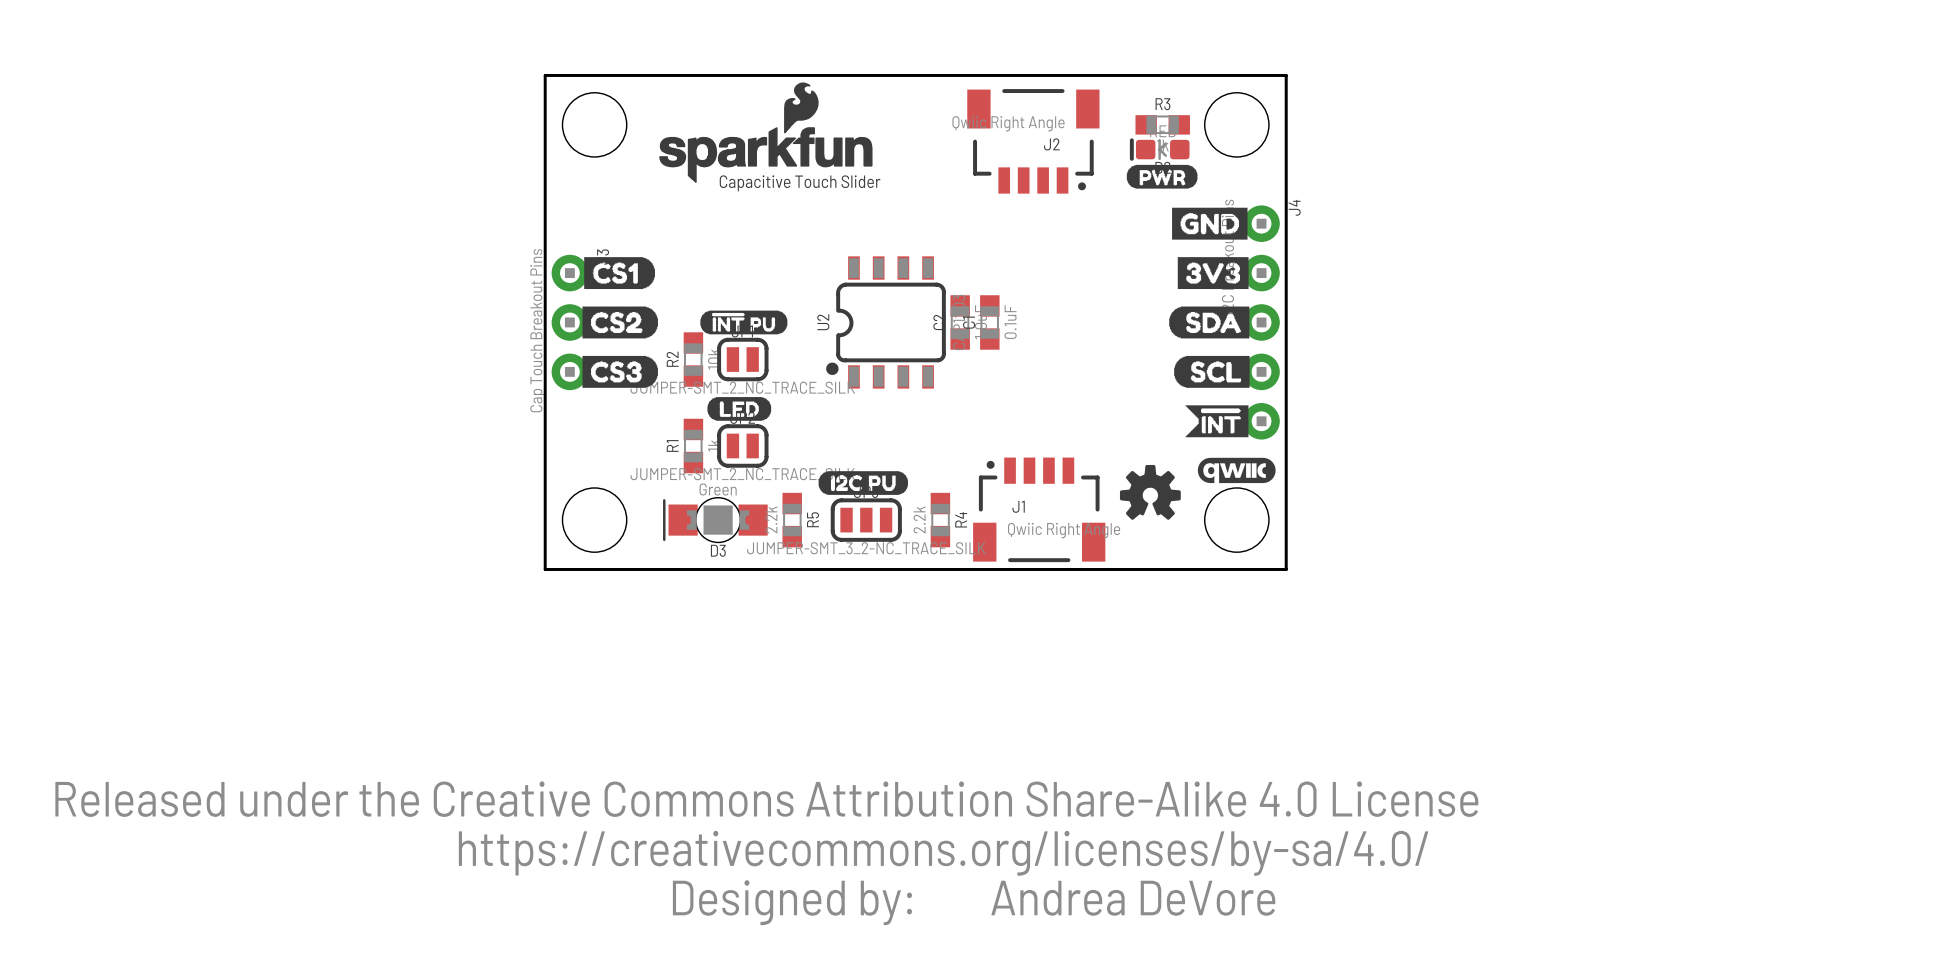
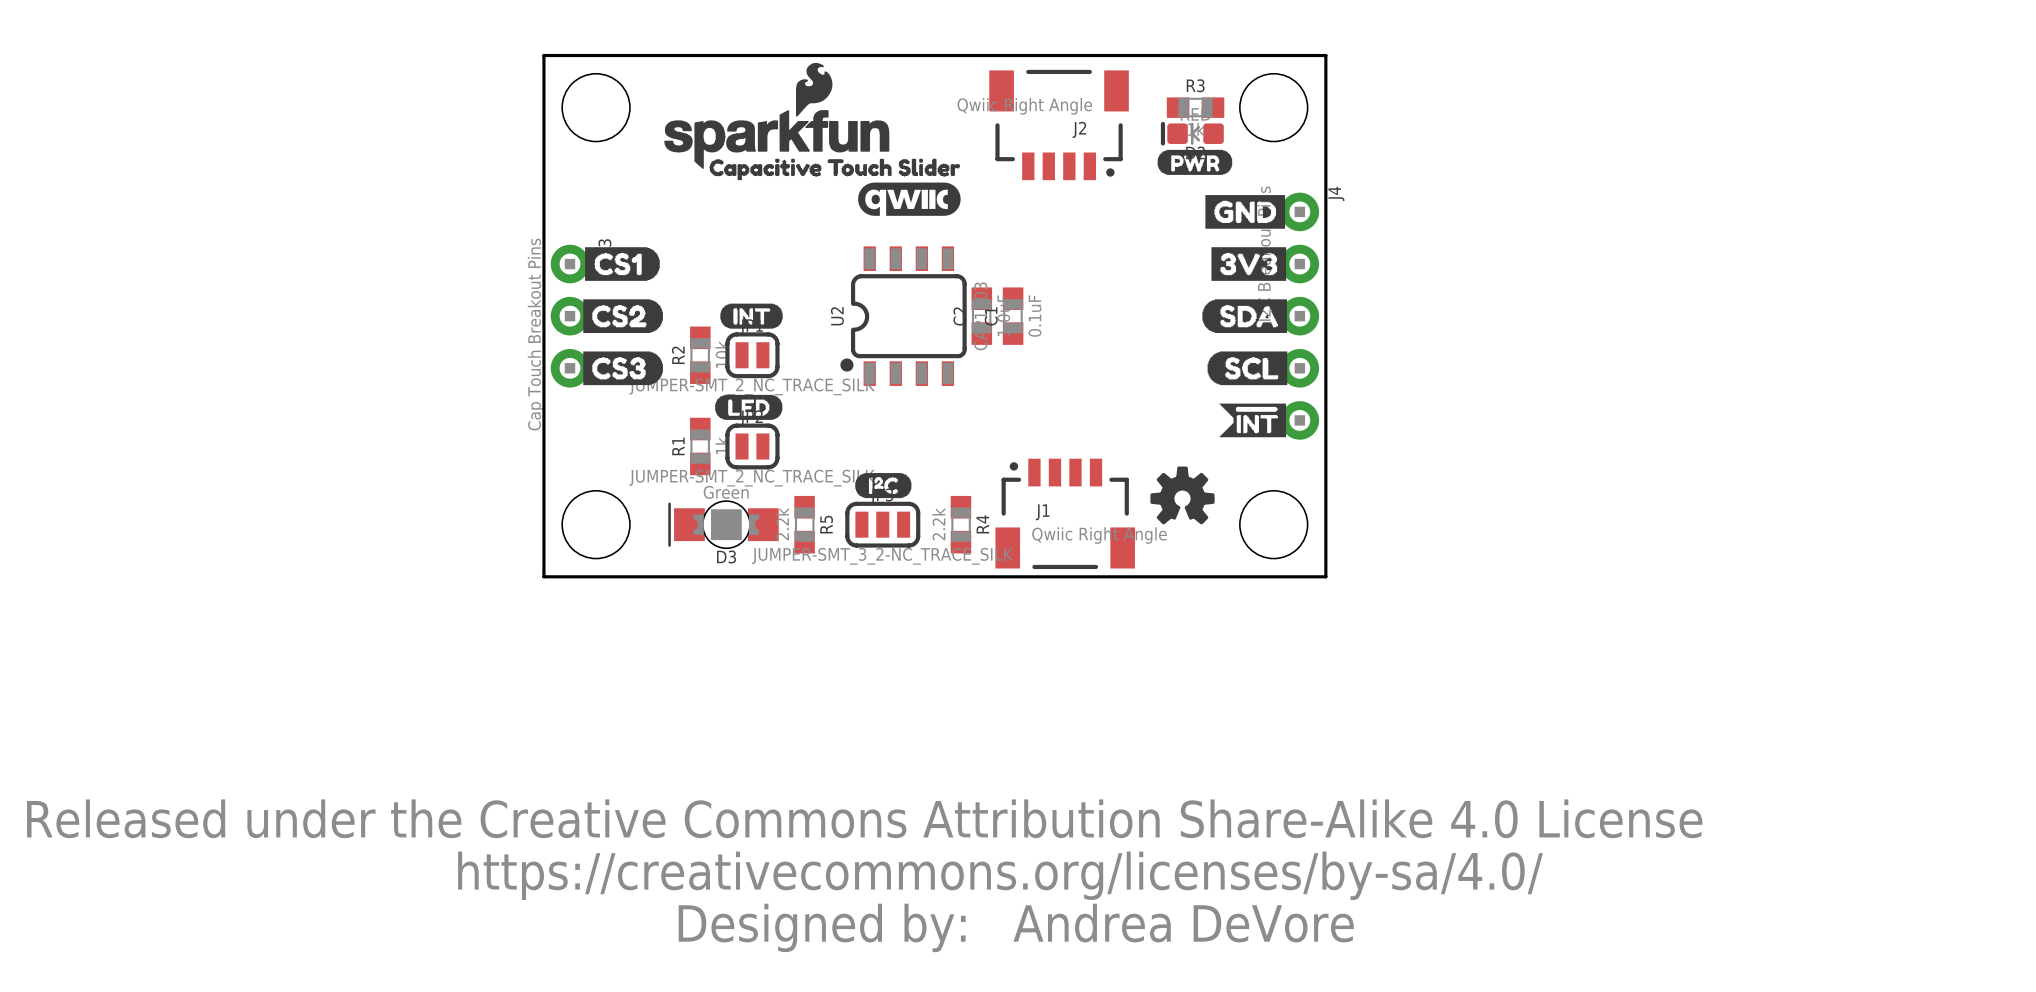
drawing: none -> [709, 158, 961, 216]
text: Capacitive Touch Slider (800, 183) -> none
drawing shape: [700, 310, 788, 335] -> [720, 303, 783, 329]
drawing: [1197, 457, 1276, 484] -> none
drawing shape: [818, 471, 908, 495] -> [855, 473, 912, 499]

